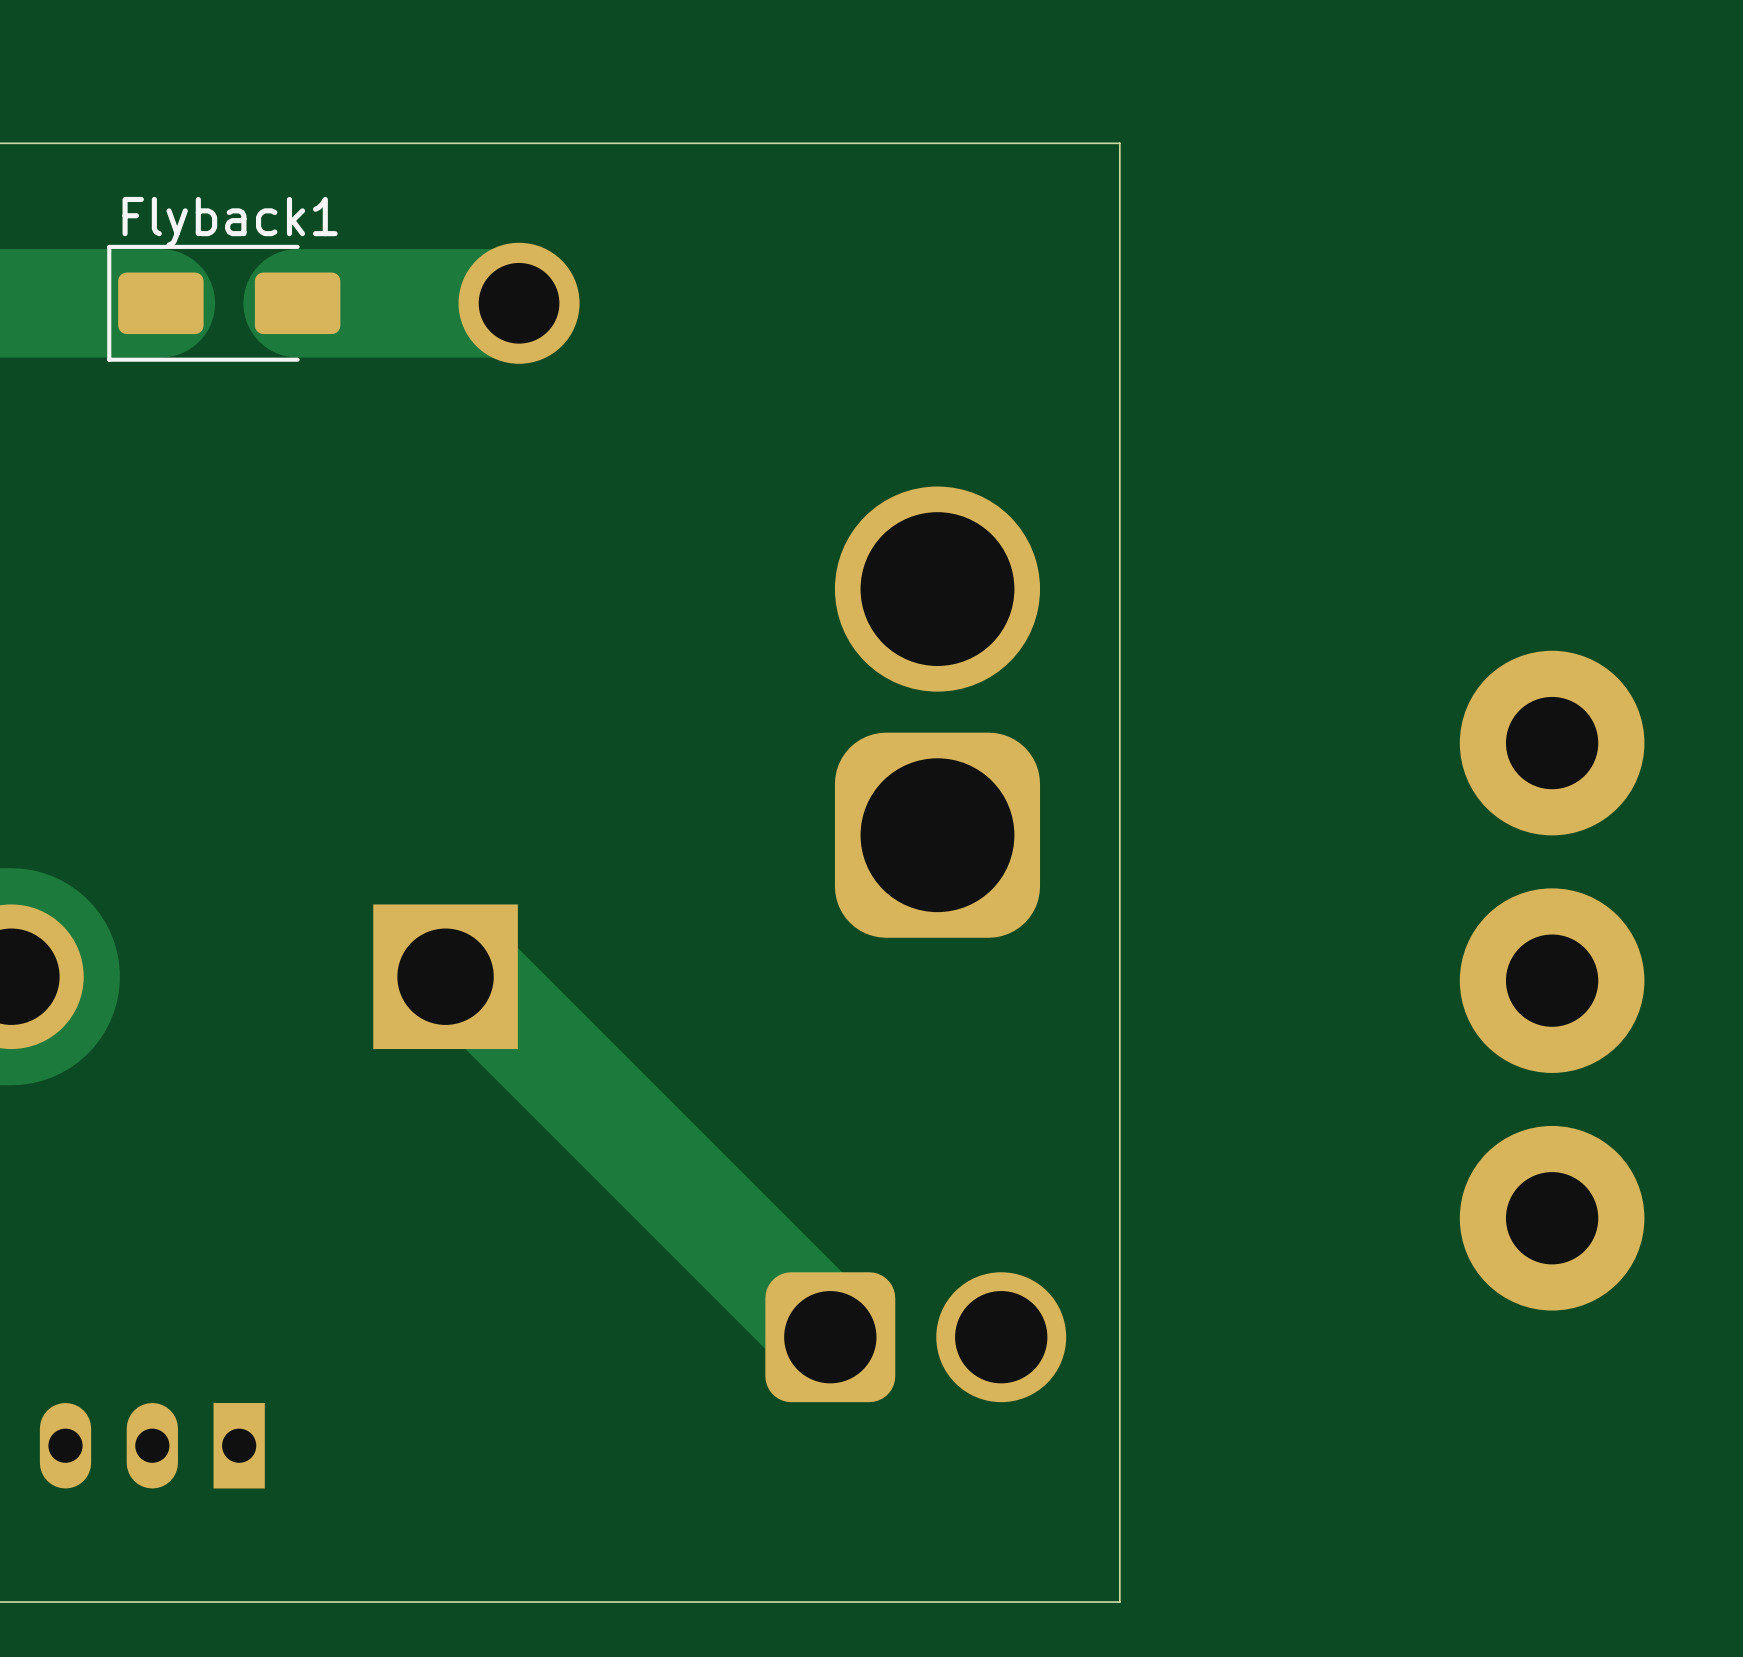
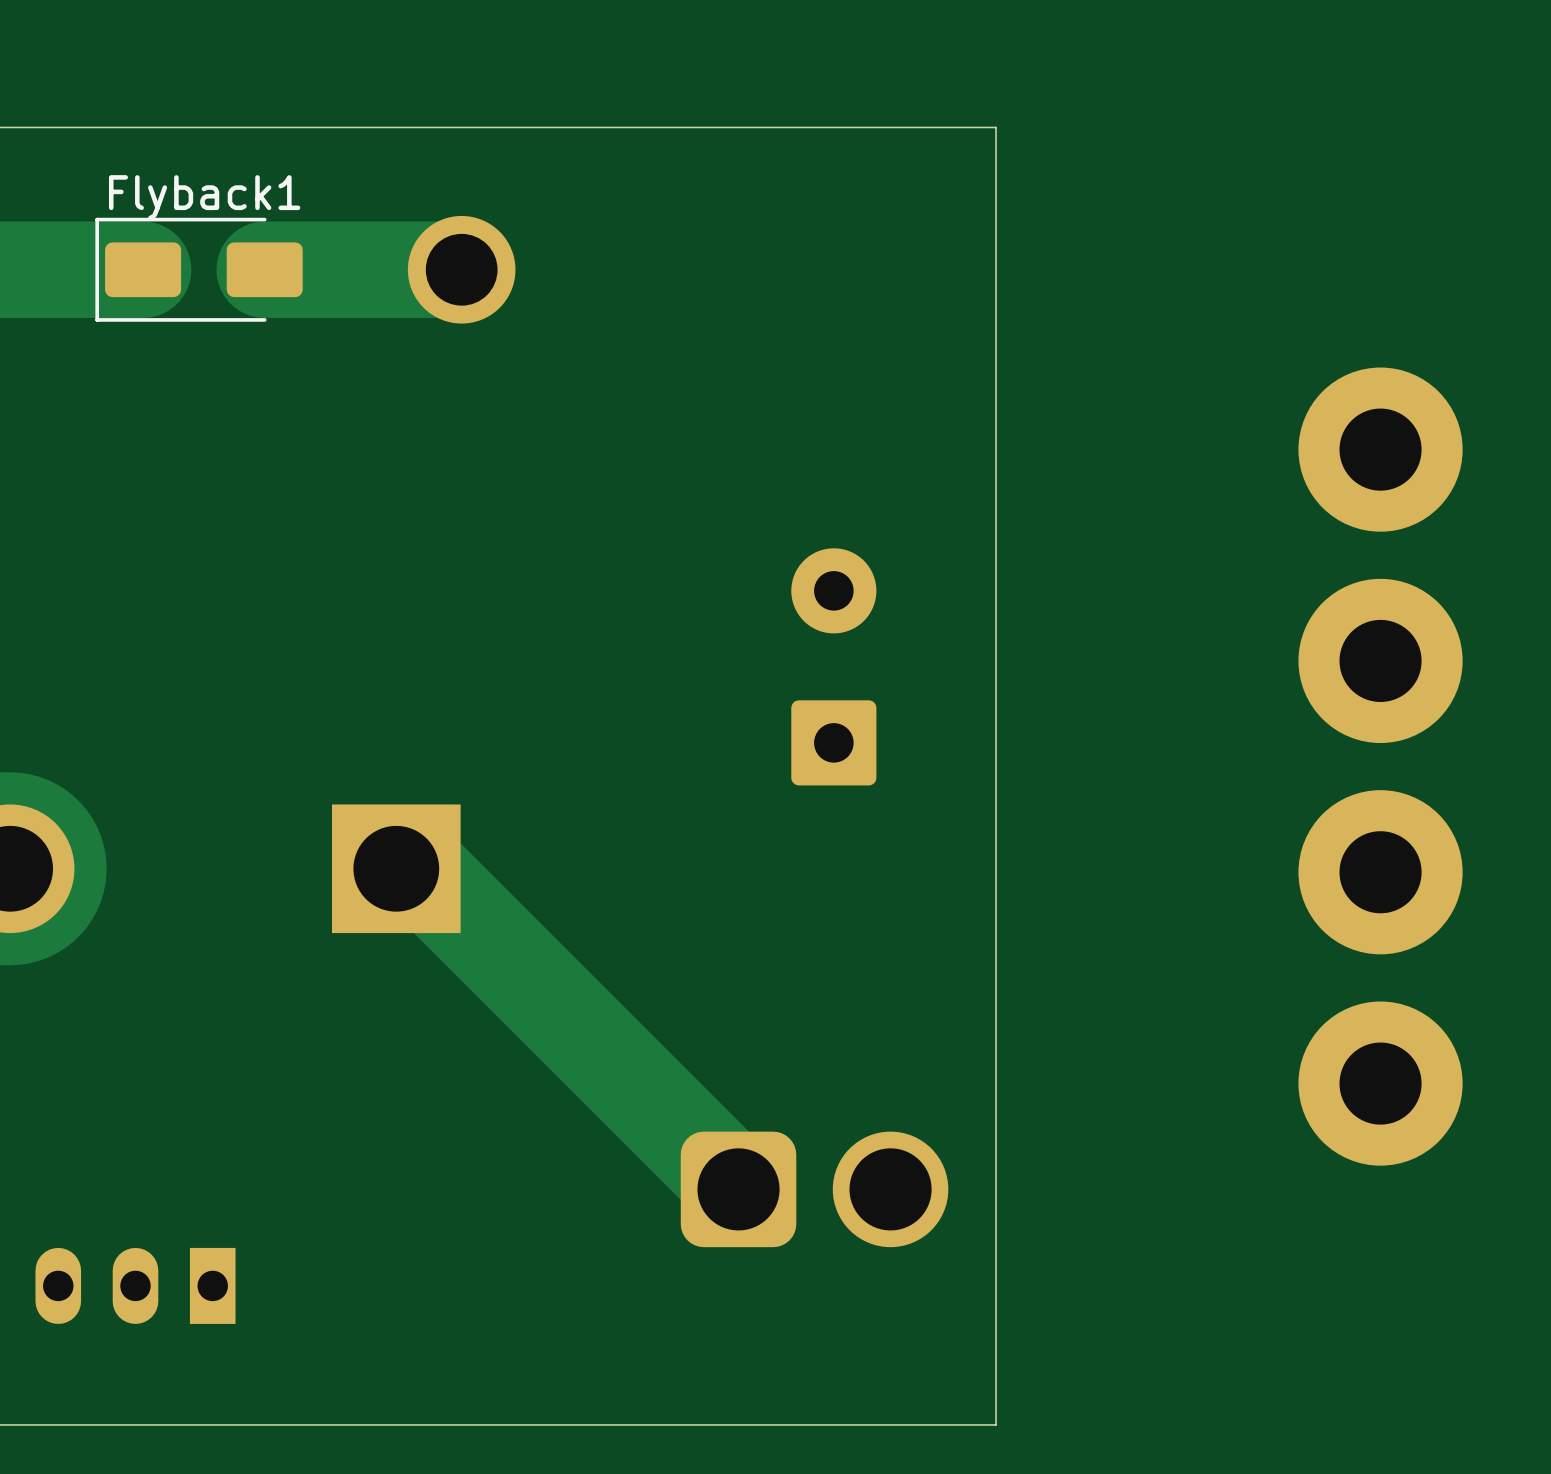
part: none -> (1380, 449)
part: (937, 712) -> none
part: none -> (833, 666)

